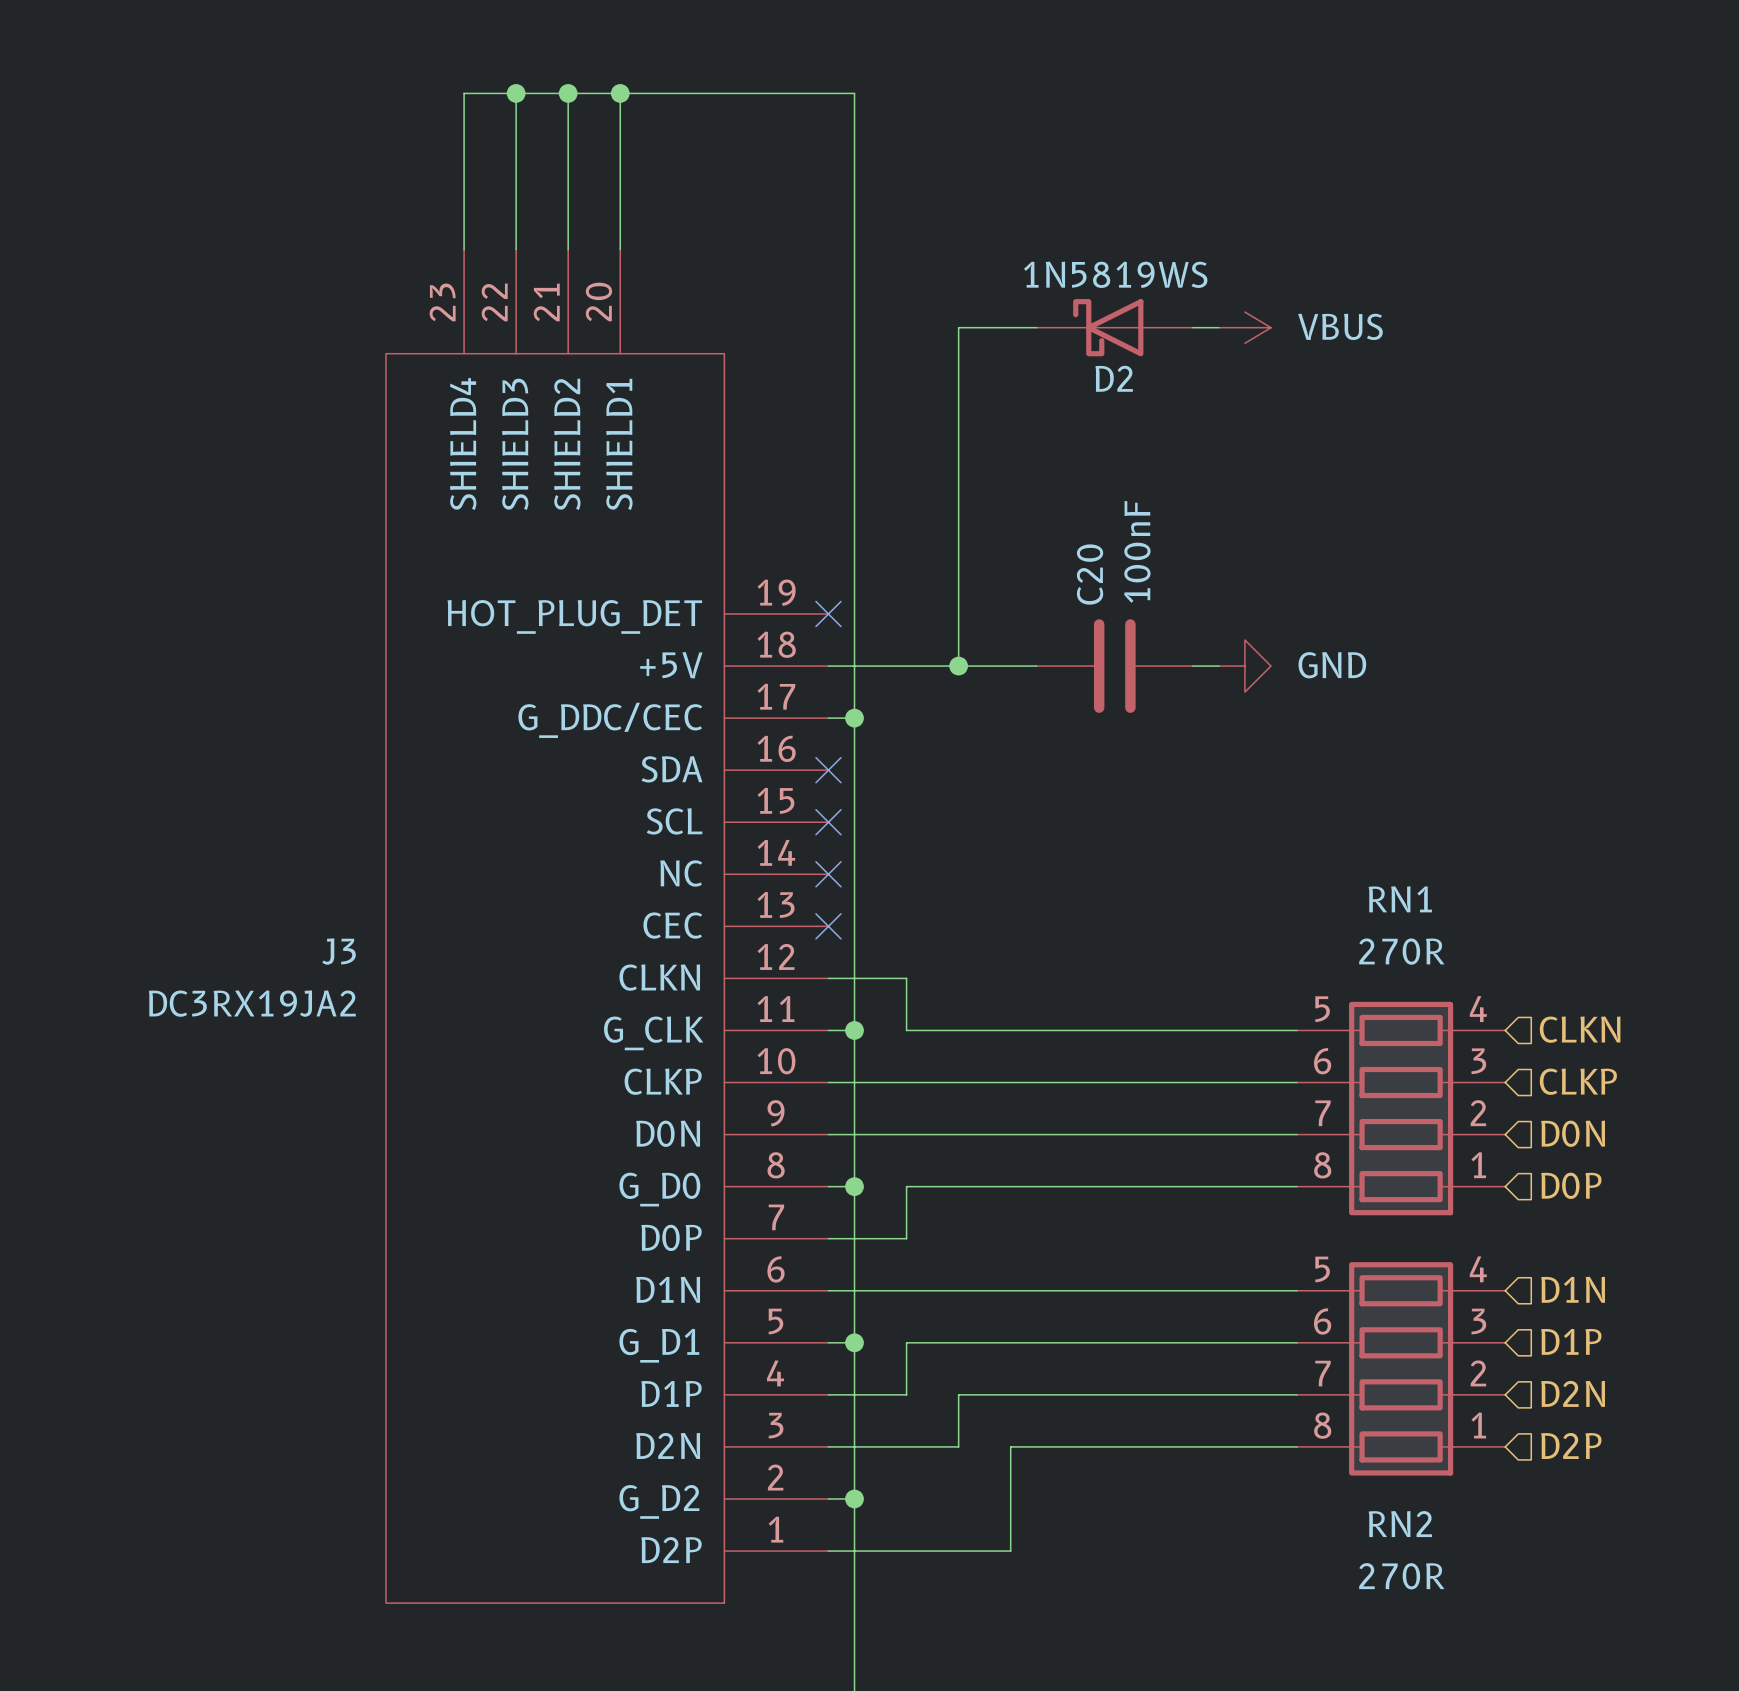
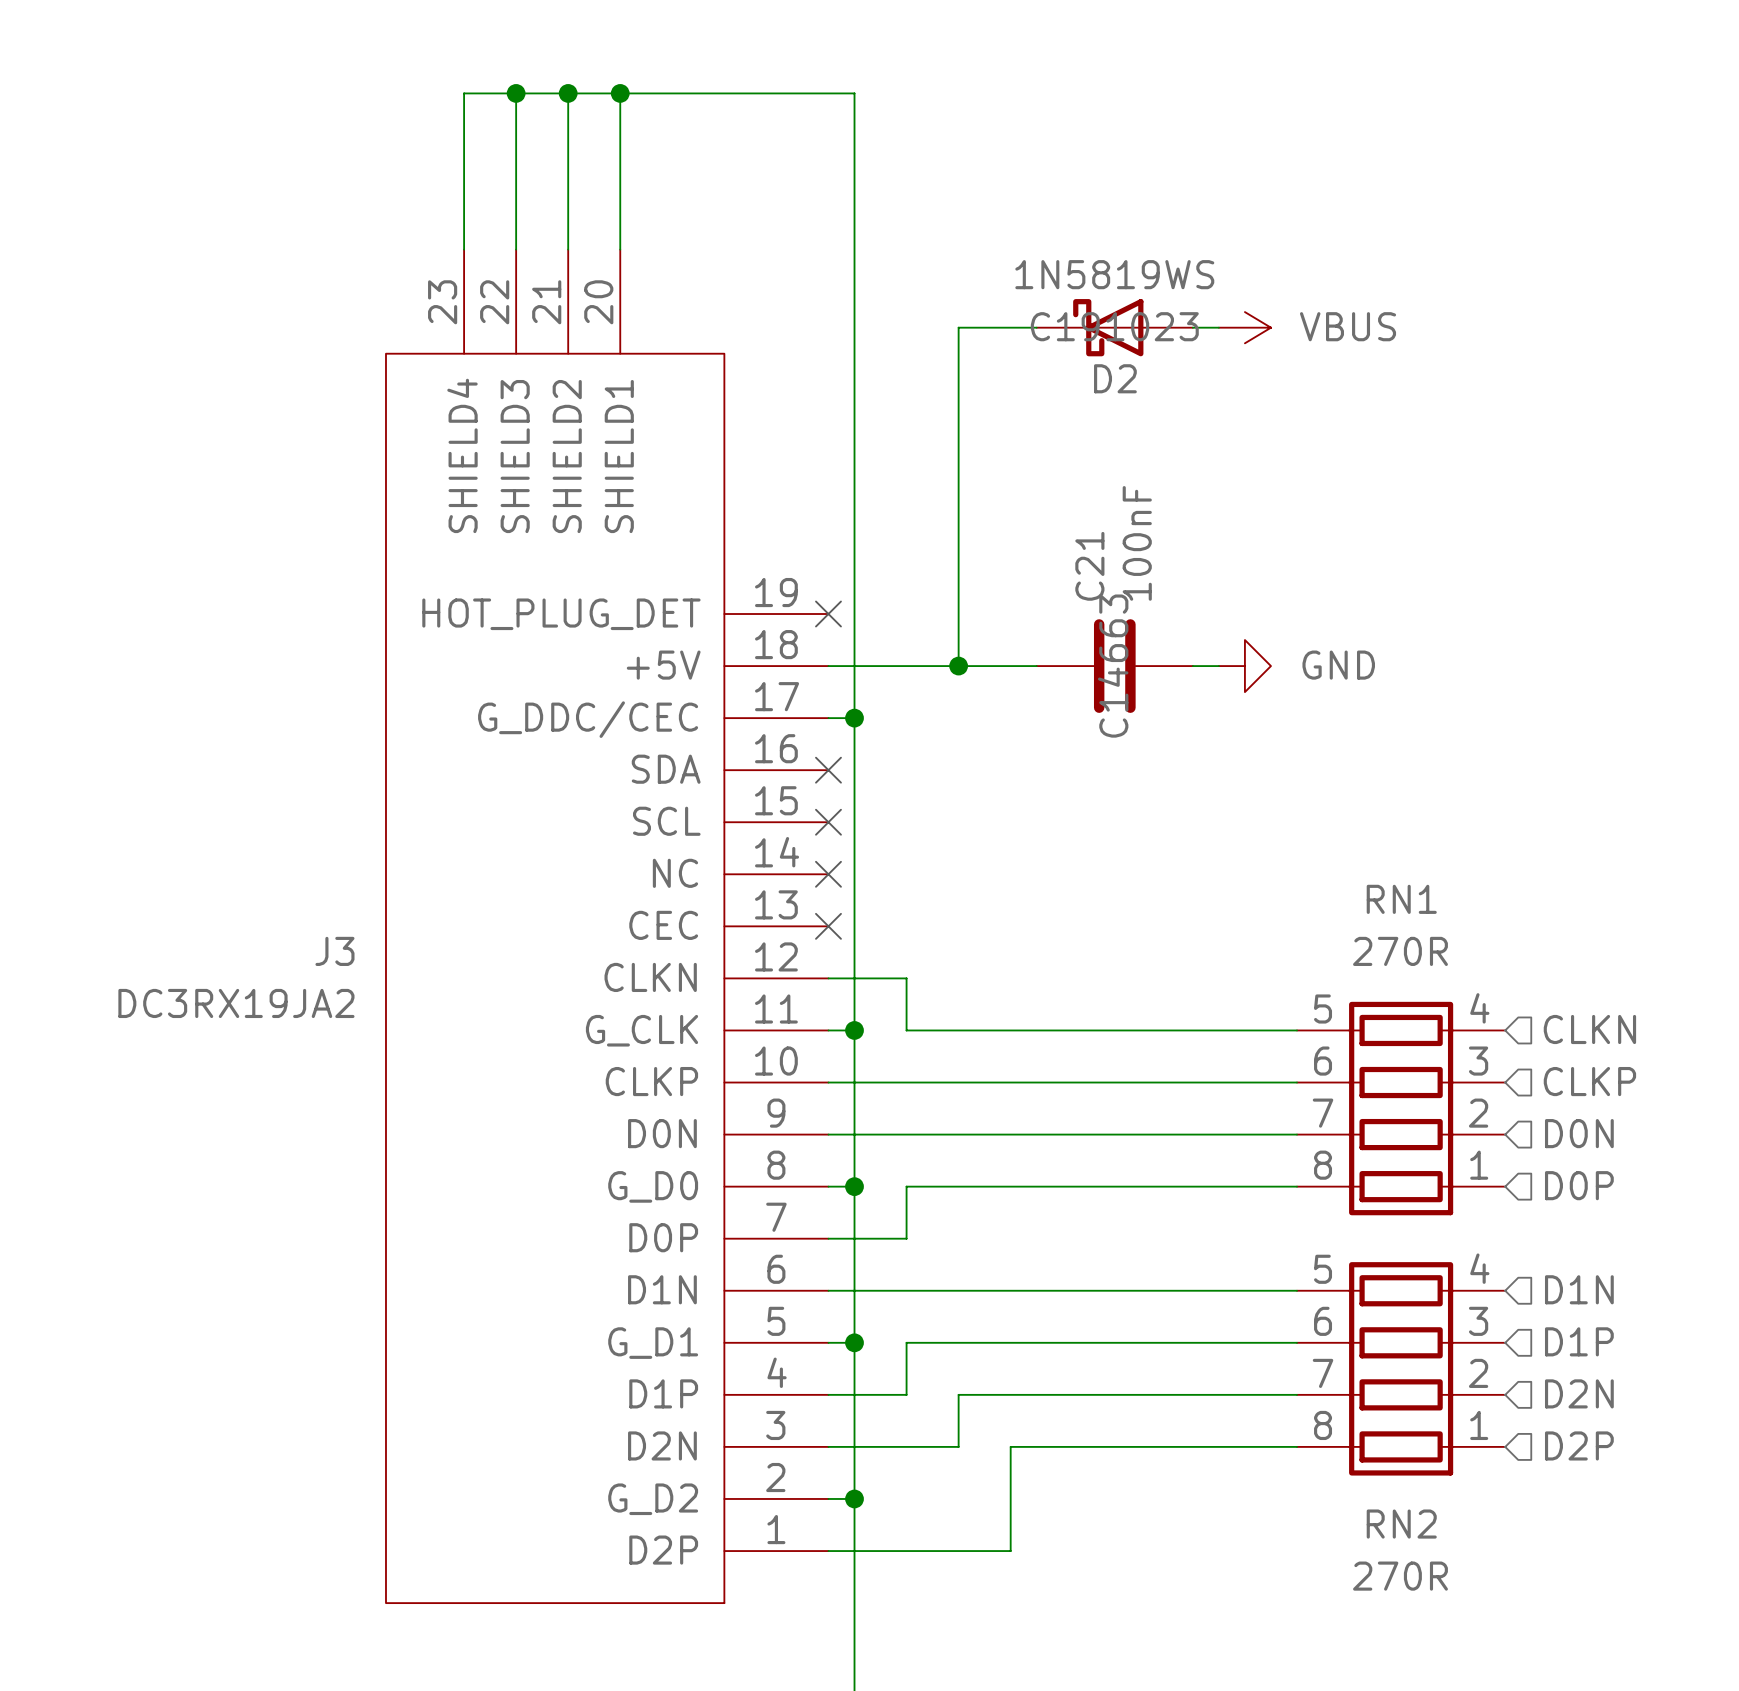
D2 text: none -> C191023 (1114, 326)
C20 name: C20 (1090, 574) -> C21 (1089, 566)
C20 text: none -> C14663 (1113, 666)

